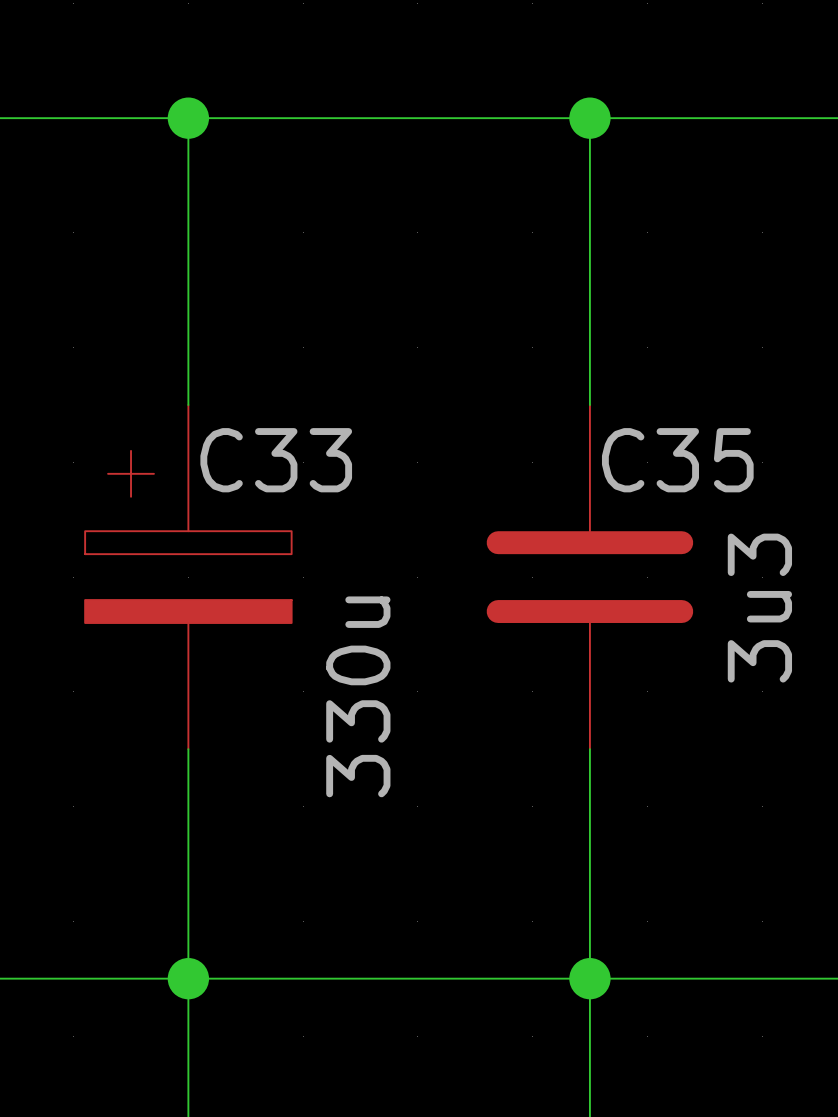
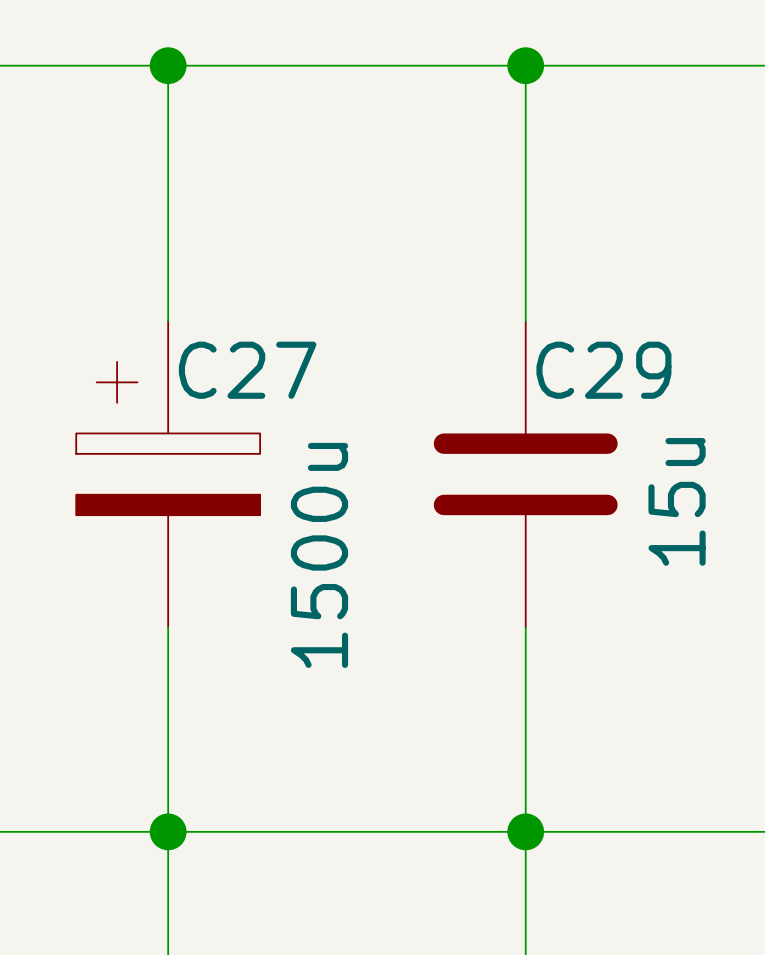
C33 name: C33 (276, 460) -> C27 (247, 370)
C35 name: C35 (677, 460) -> C29 (603, 370)
C35 value: 3u3 (759, 608) -> 15u (677, 501)
C33 value: 330u (358, 696) -> 1500u (319, 555)

